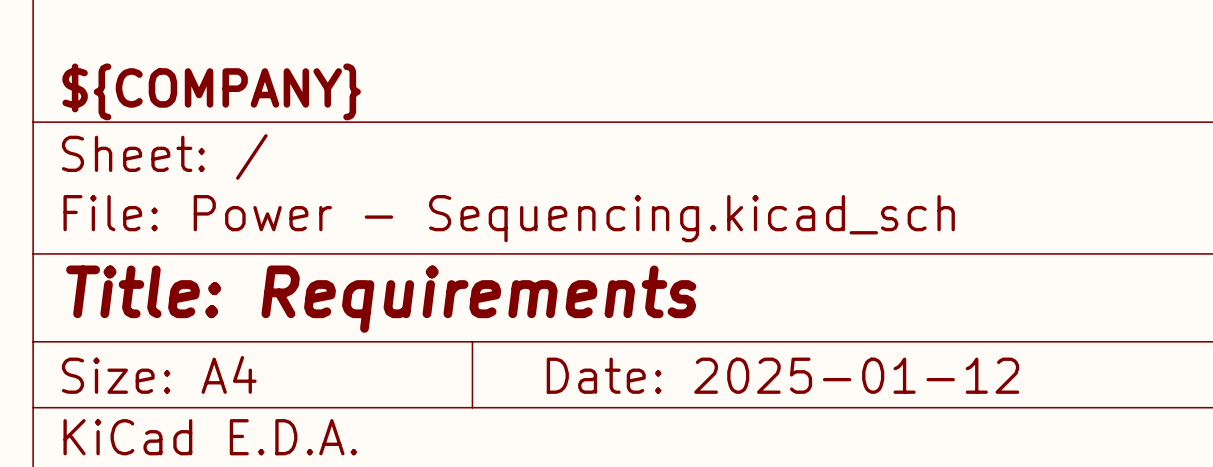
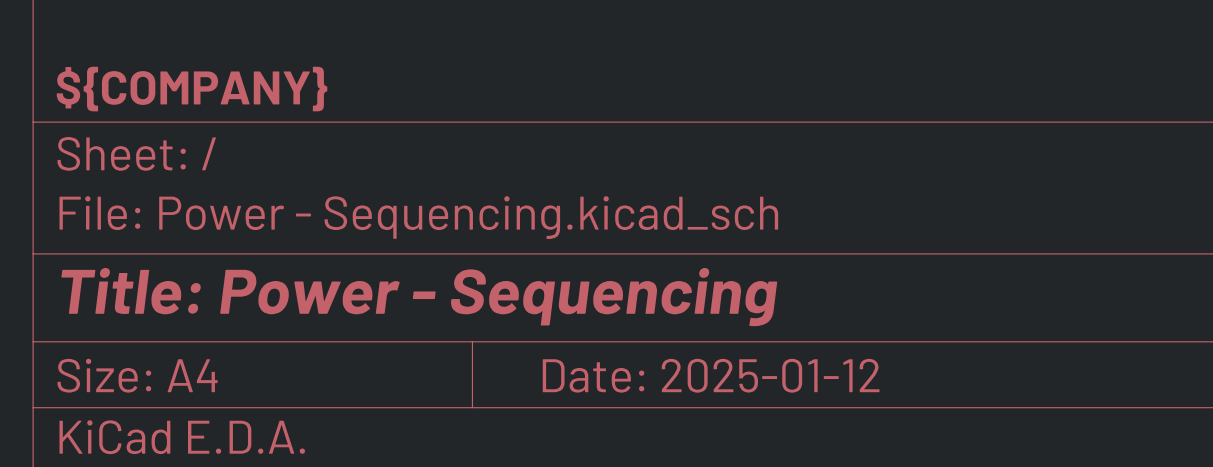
title block: Title: Requirements (381, 299) -> Title: Power - Sequencing (419, 297)

